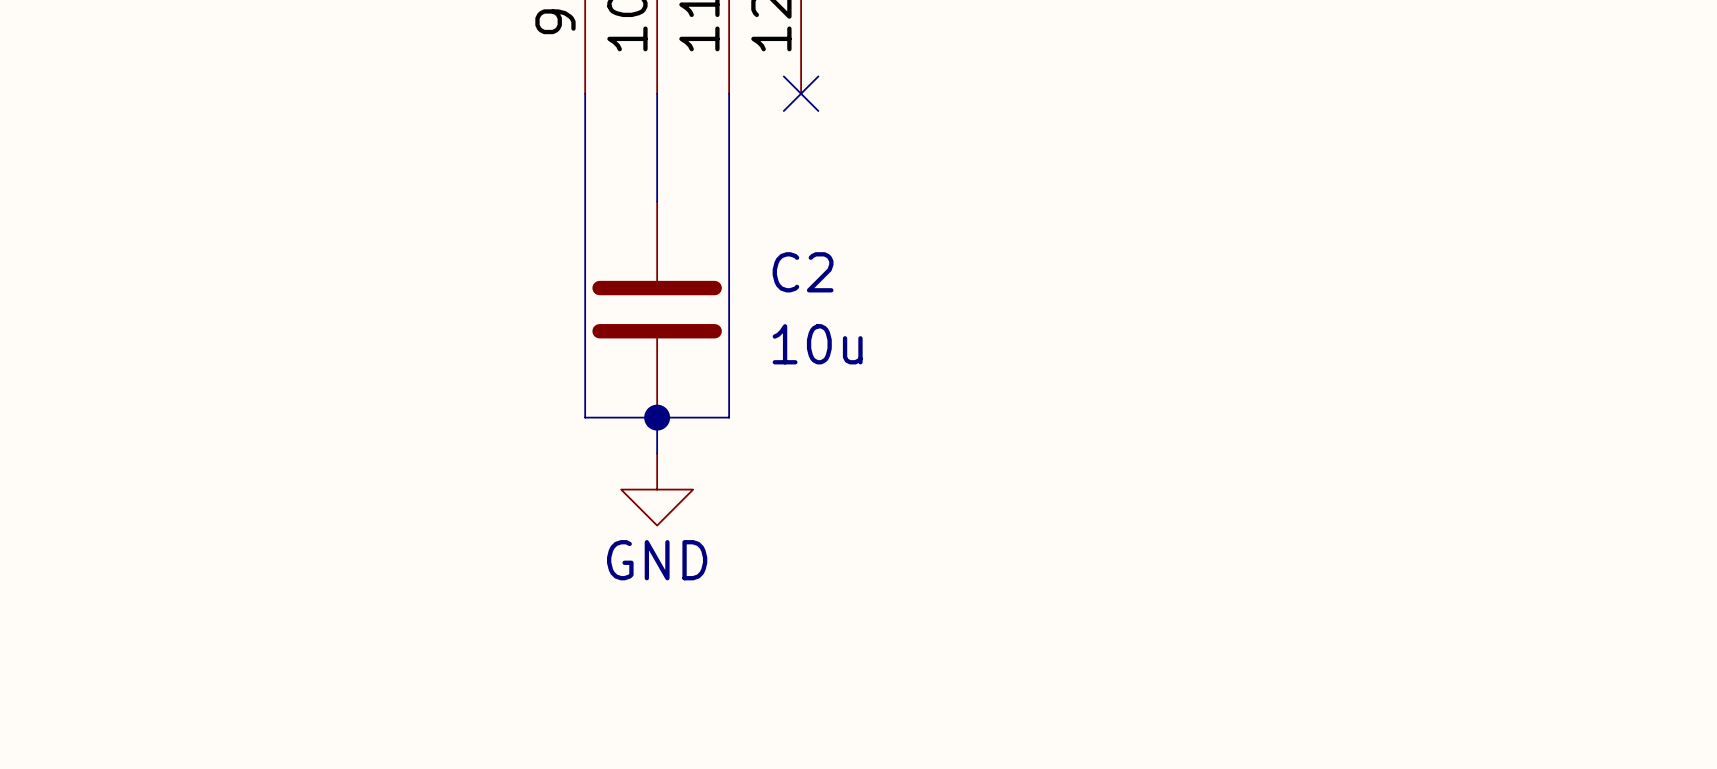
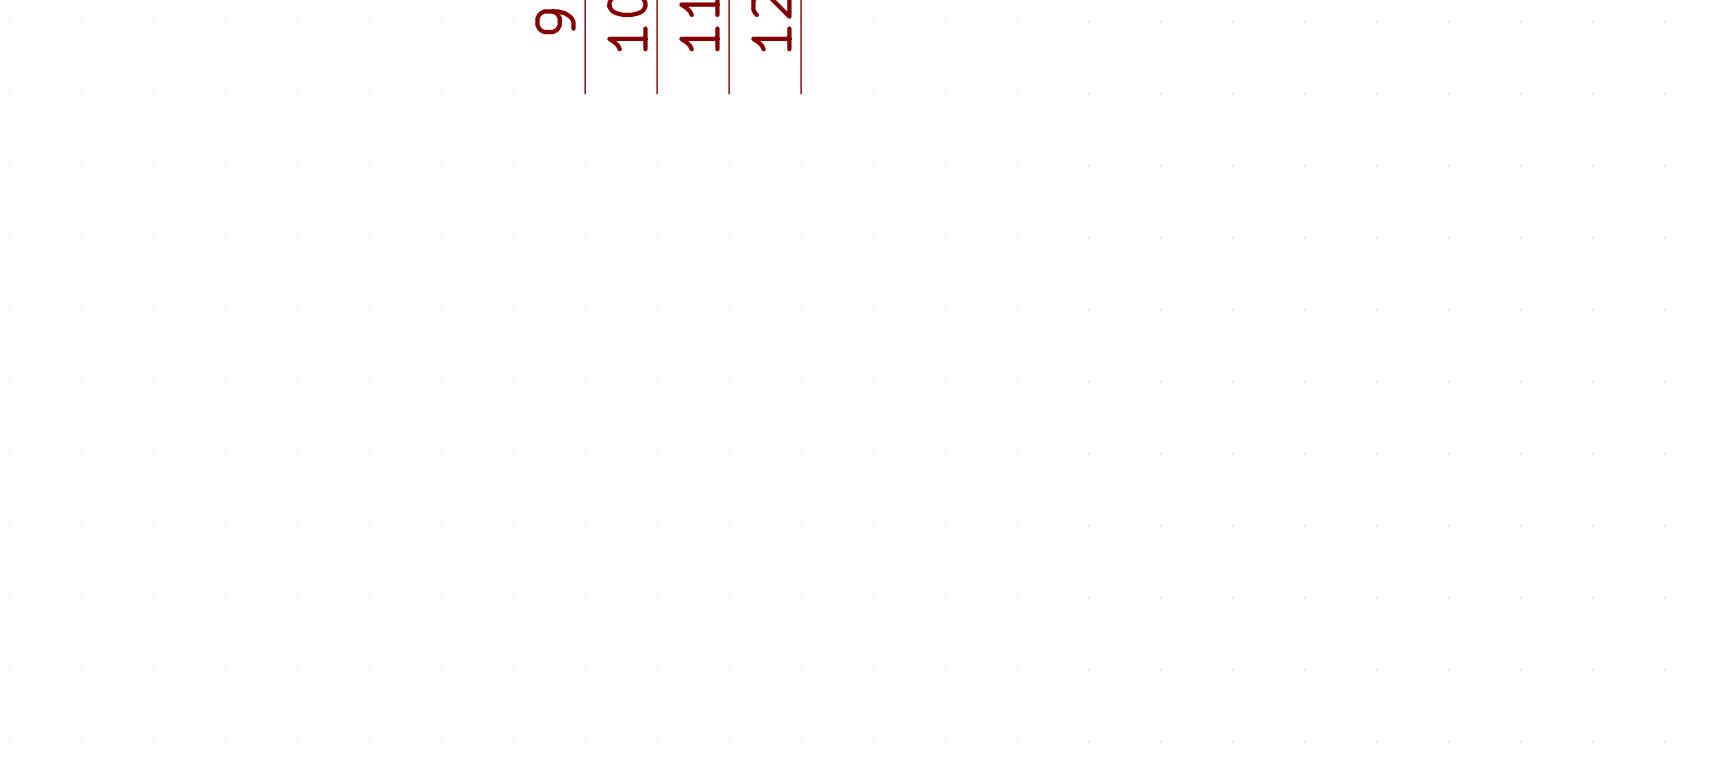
wire: (585, 93) (585, 417) (729, 417) (729, 93) -> none
wire: (657, 93) (657, 201) -> none
no-connect mark: (801, 93) -> none
C2: 10u (657, 309) -> none
wire: (657, 417) (657, 453) -> none
junction: (657, 417) -> none
power symbol: GND (657, 489) -> none

